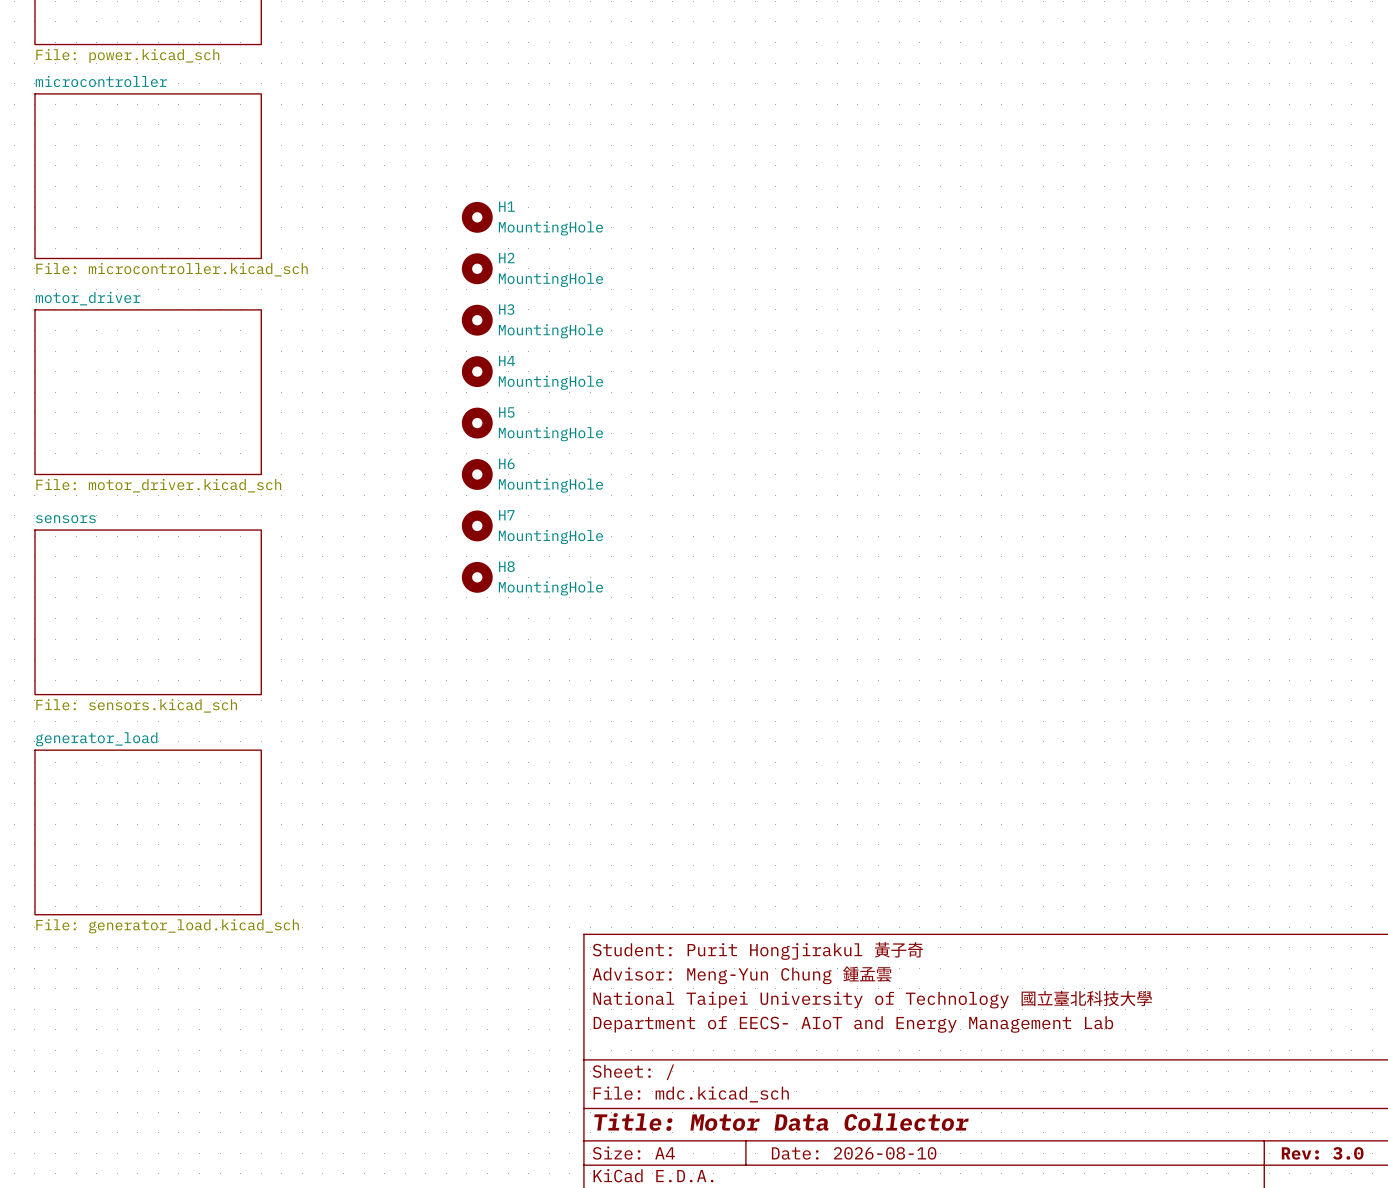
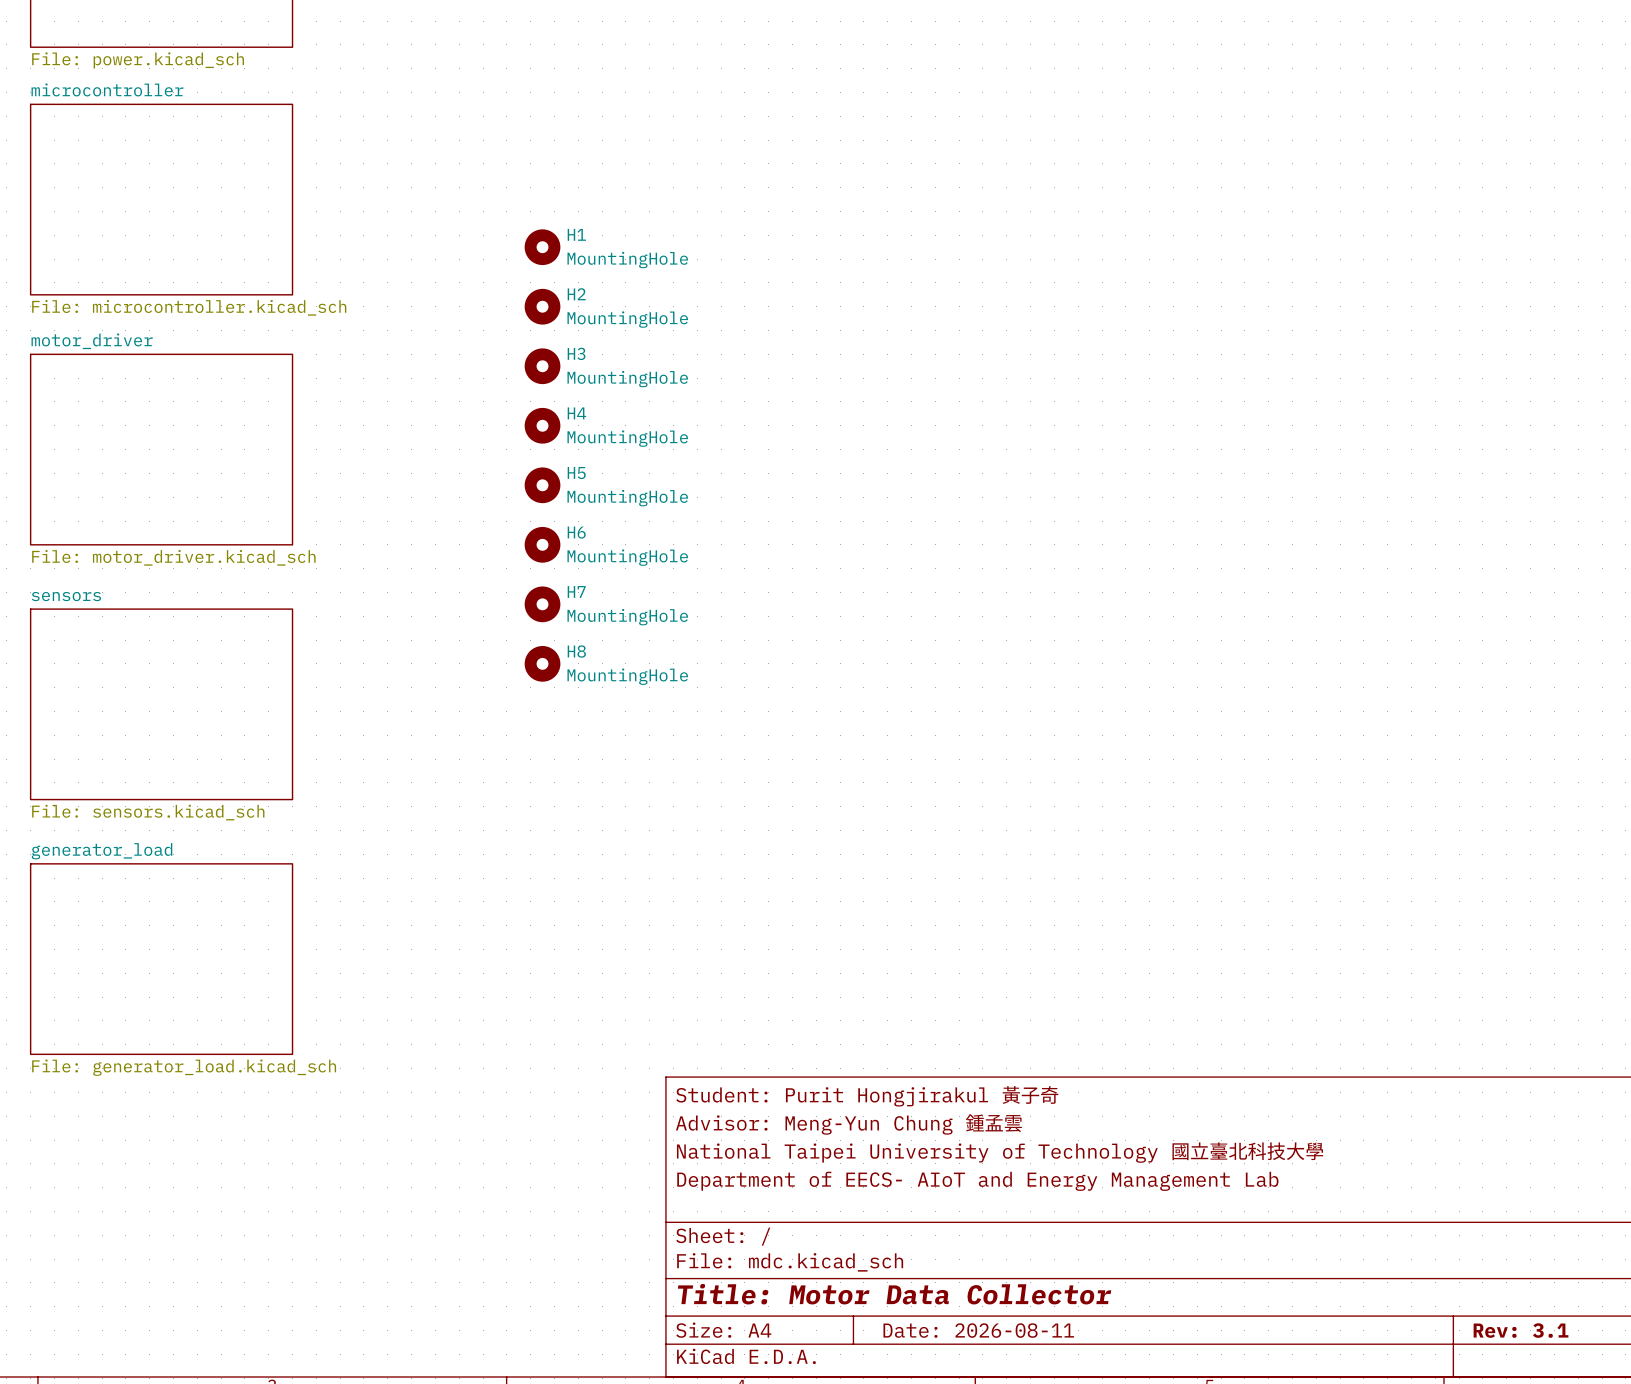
title block: Date: 2026-08-10 (854, 1153) -> Date: 2026-08-11 (978, 1330)
title block: Rev: 3.0 (1322, 1153) -> Rev: 3.1 (1521, 1330)

